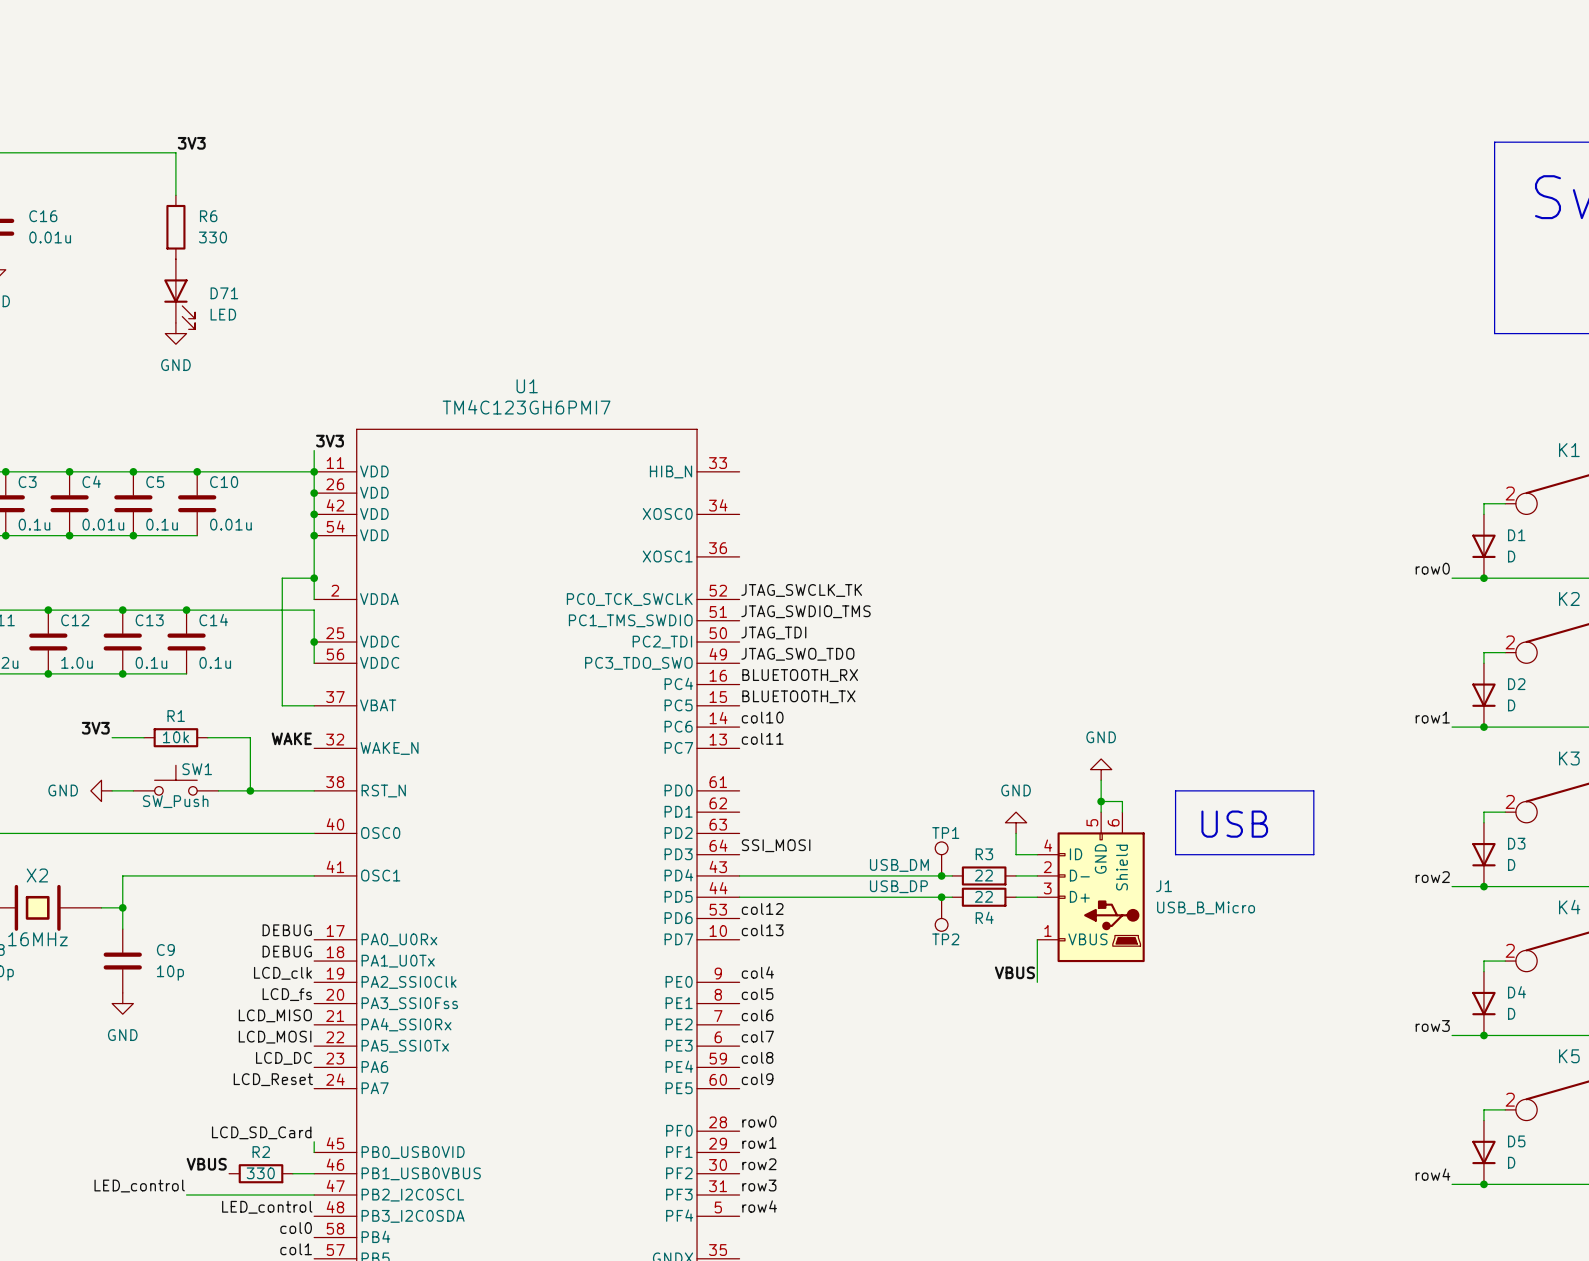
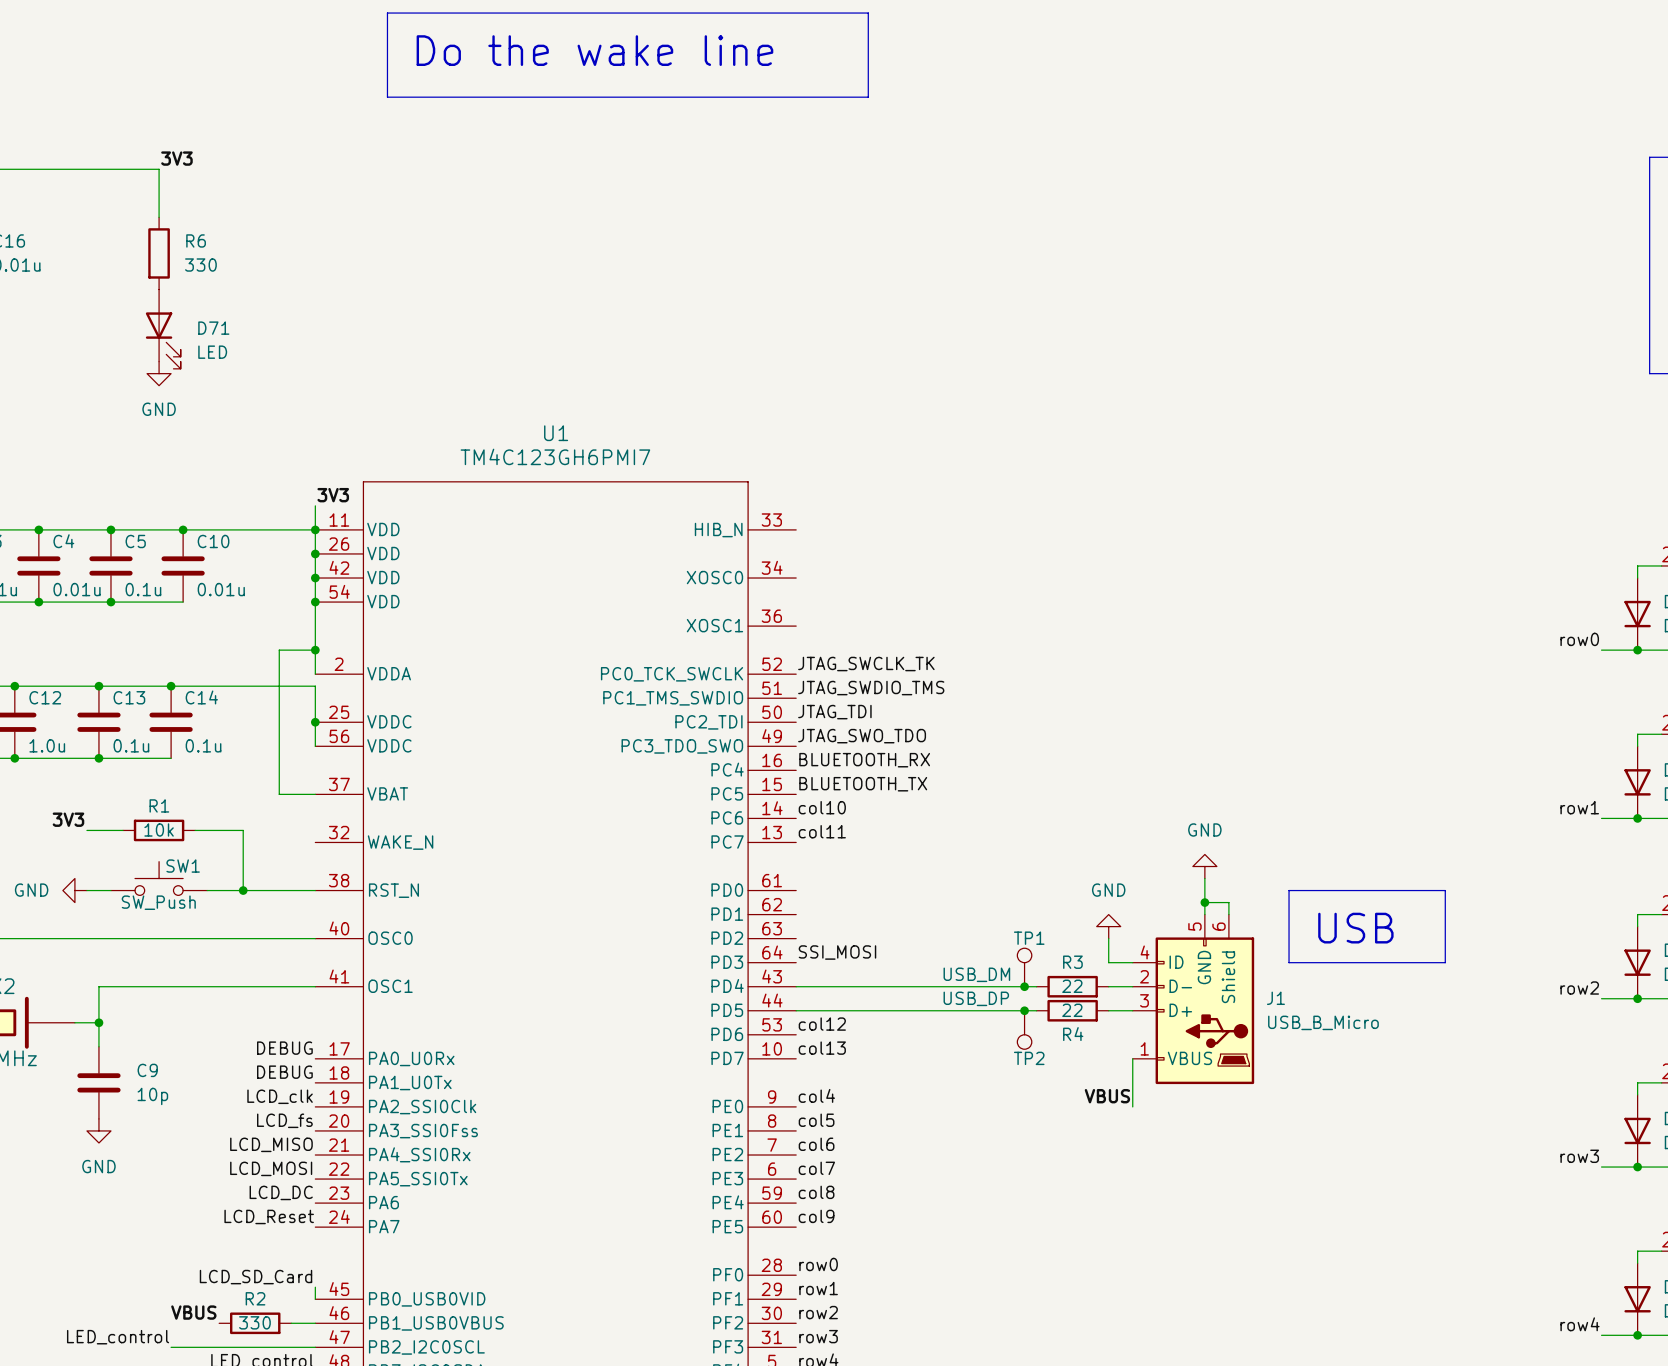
line: none -> (387, 13) (868, 13) (868, 97) (387, 97) (387, 13)
text: none -> Do the wake line (594, 50)
label: WAKE (291, 738) -> none

